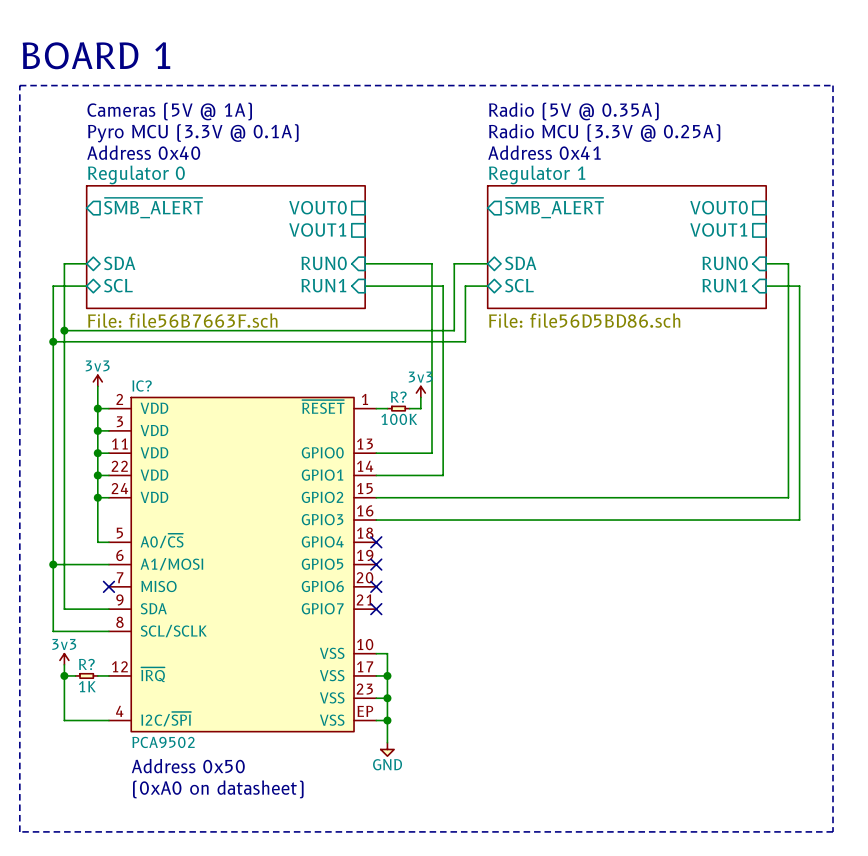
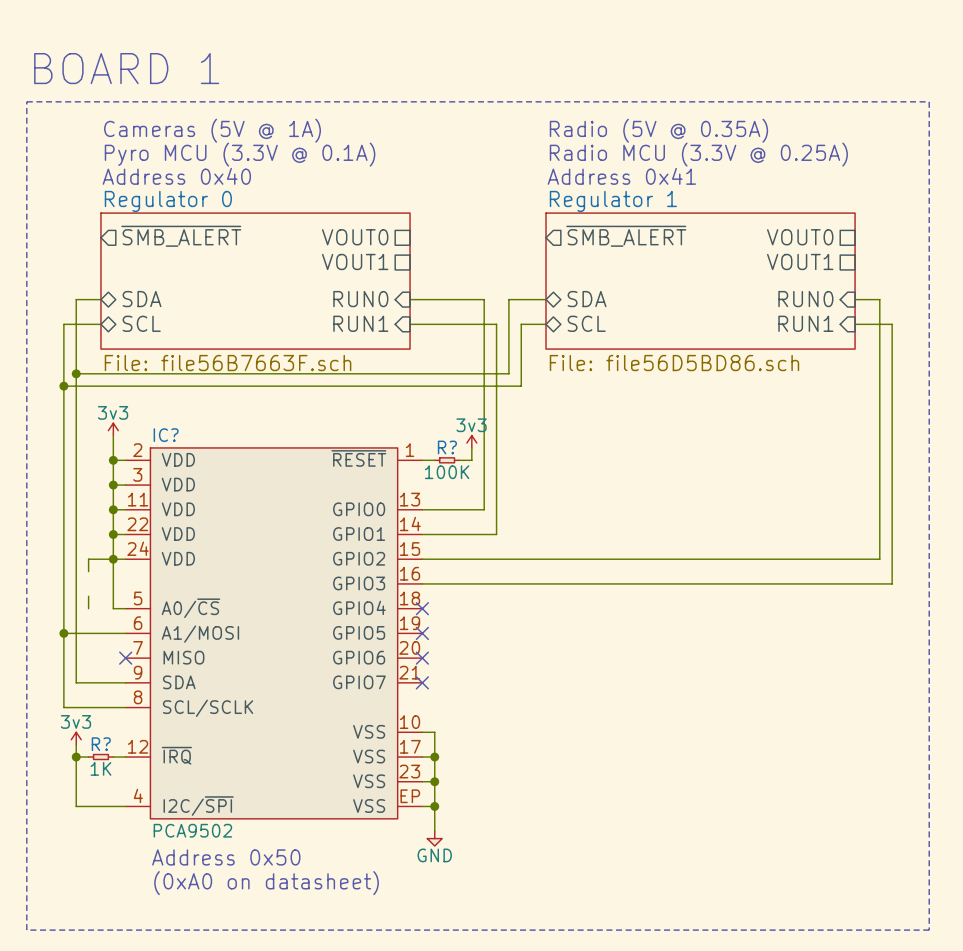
wire: none -> (113, 559) (88, 559) (88, 571)
wire: none -> (88, 596) (88, 608)

